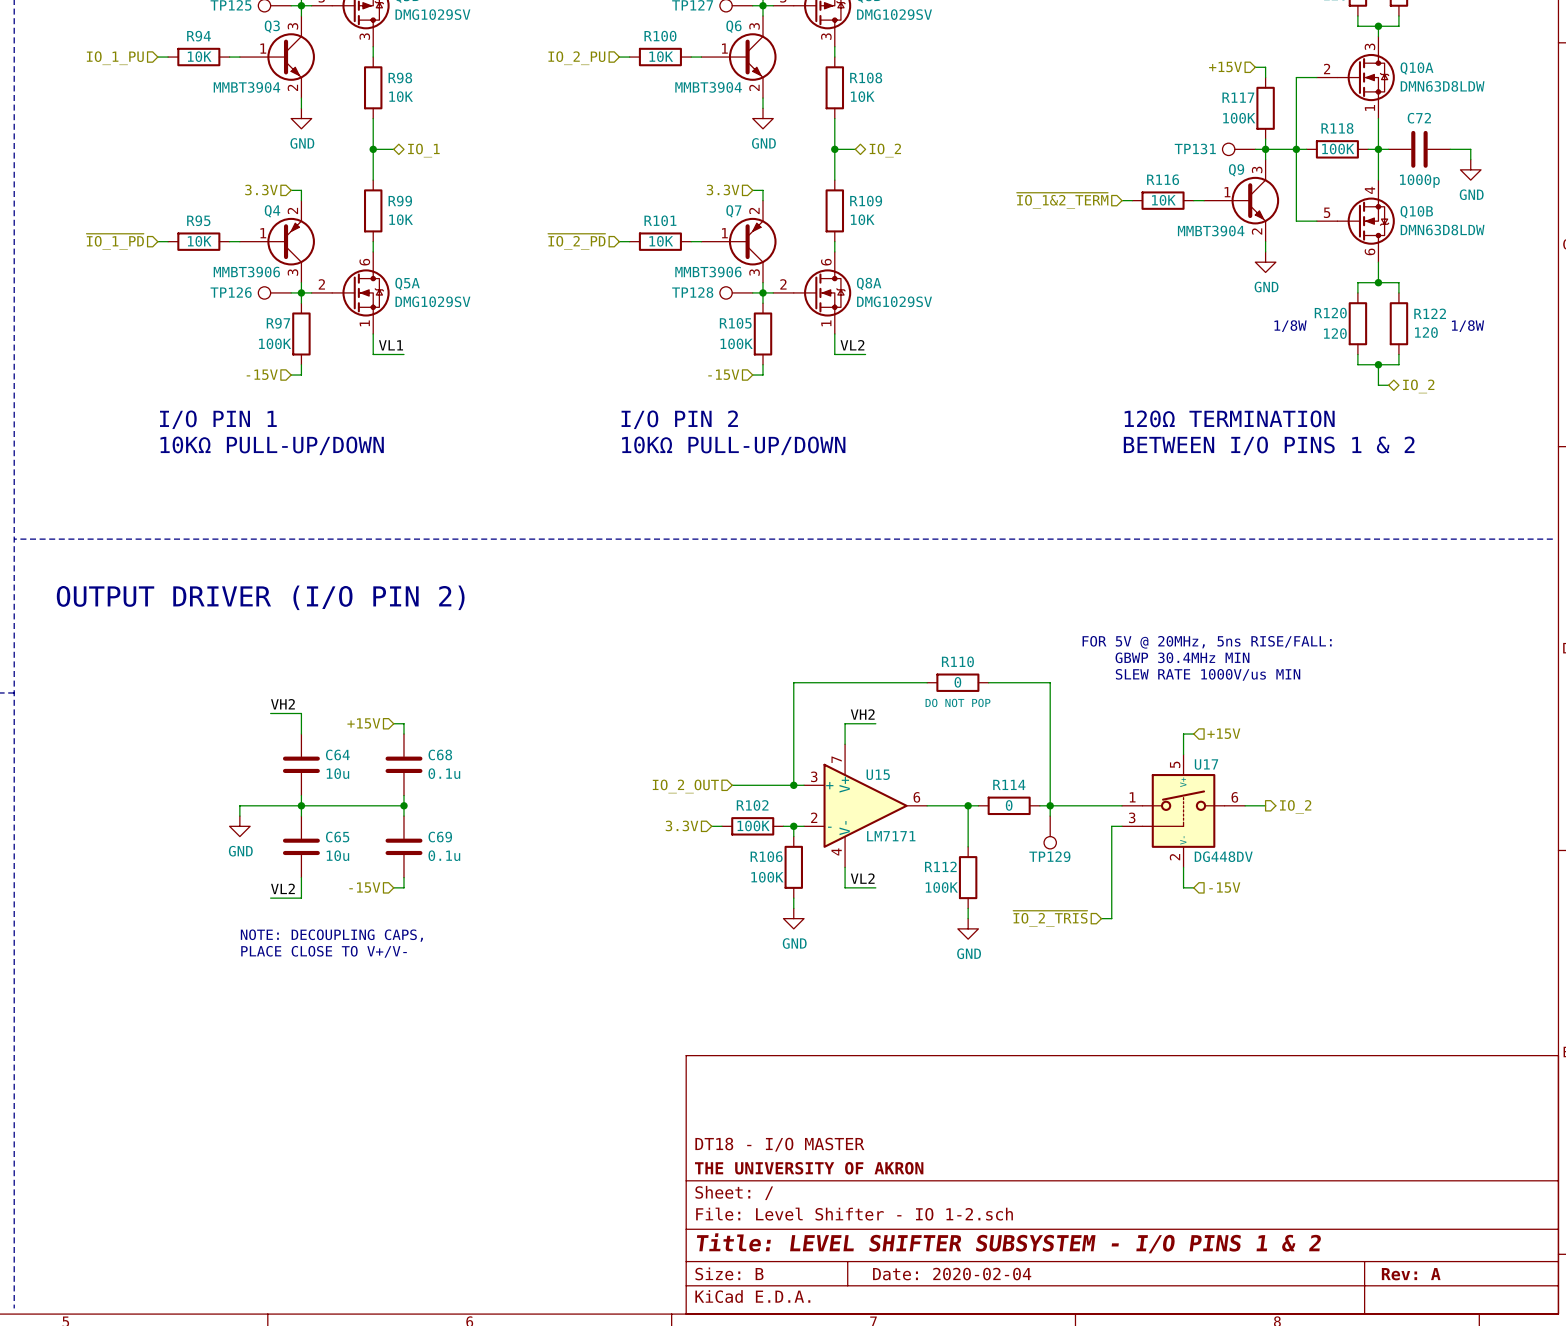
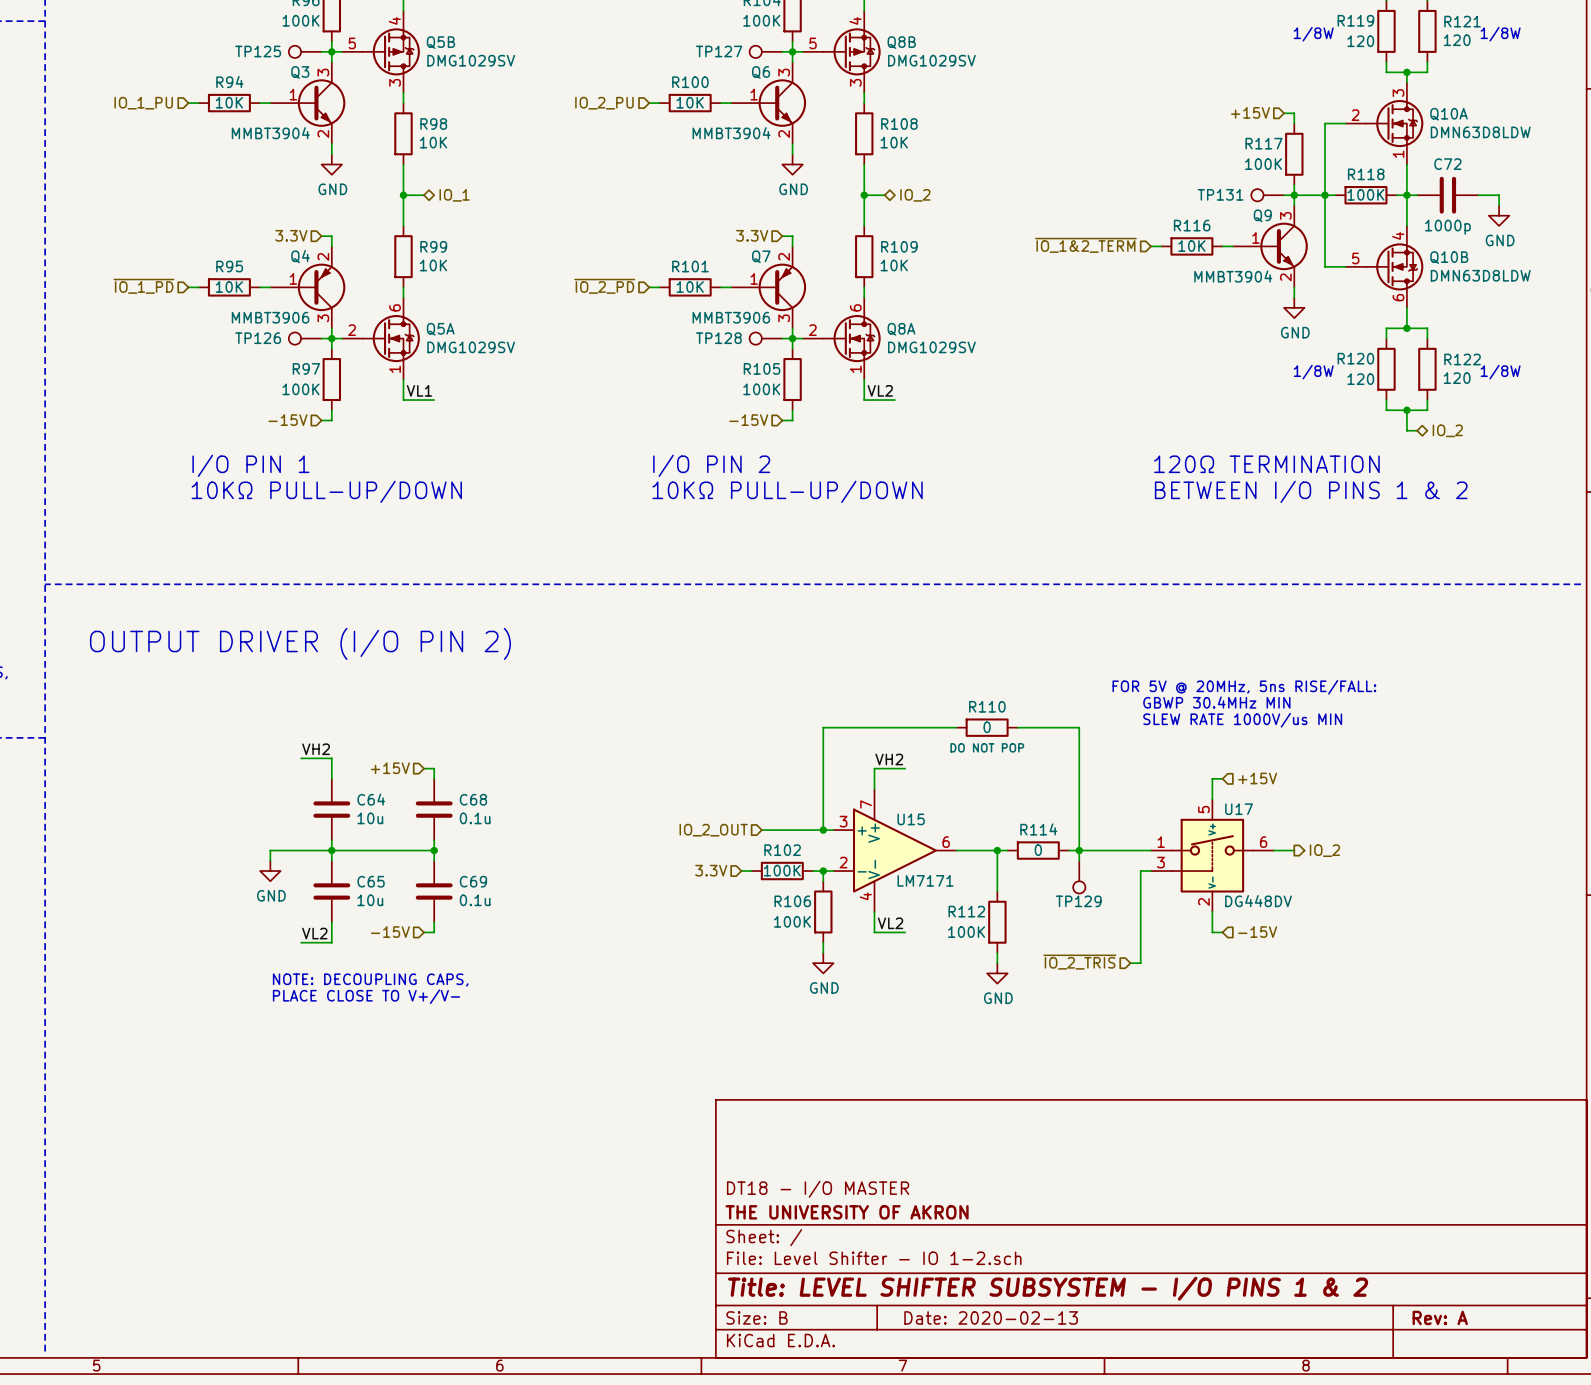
title block: Date: 2020-02-04 (952, 1274) -> Date: 2020-02-13 (991, 1317)

